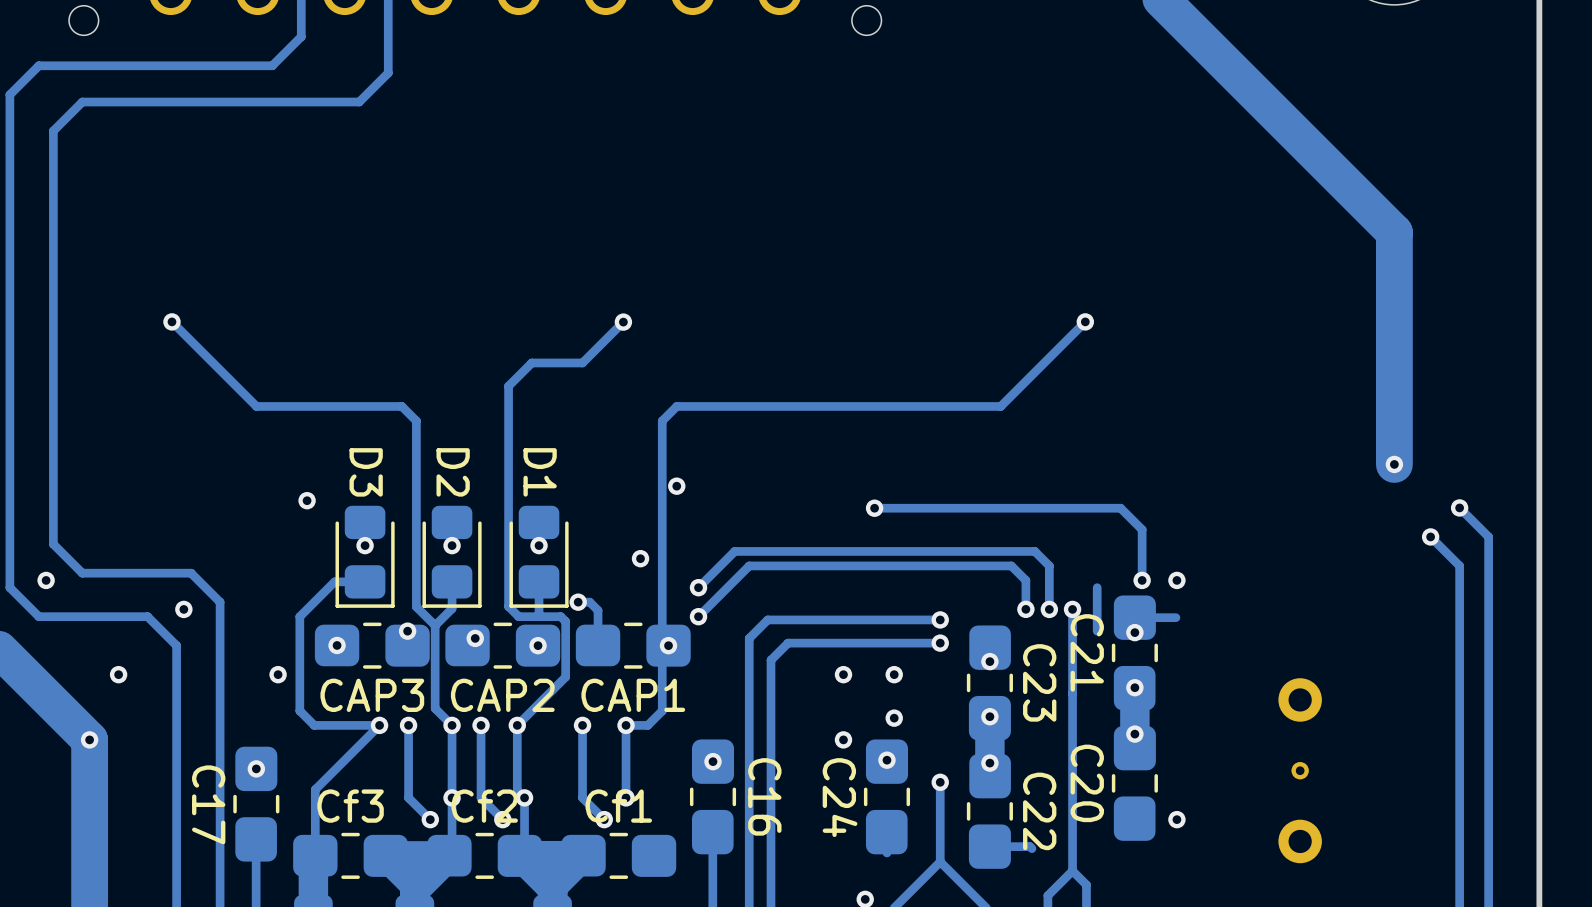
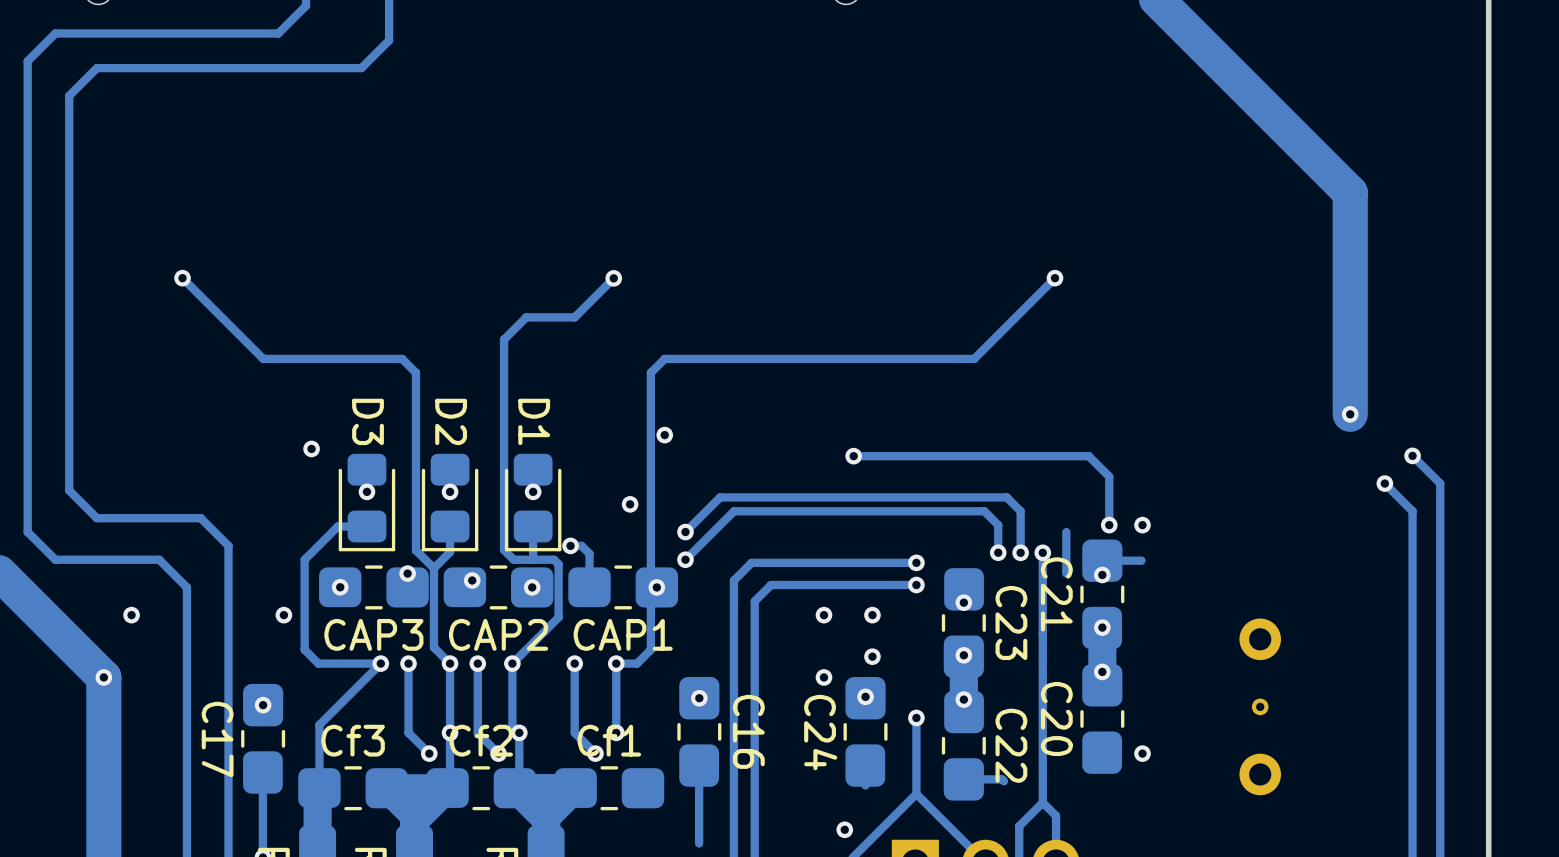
via: (46, 580) -> none
via: (183, 609) -> none

